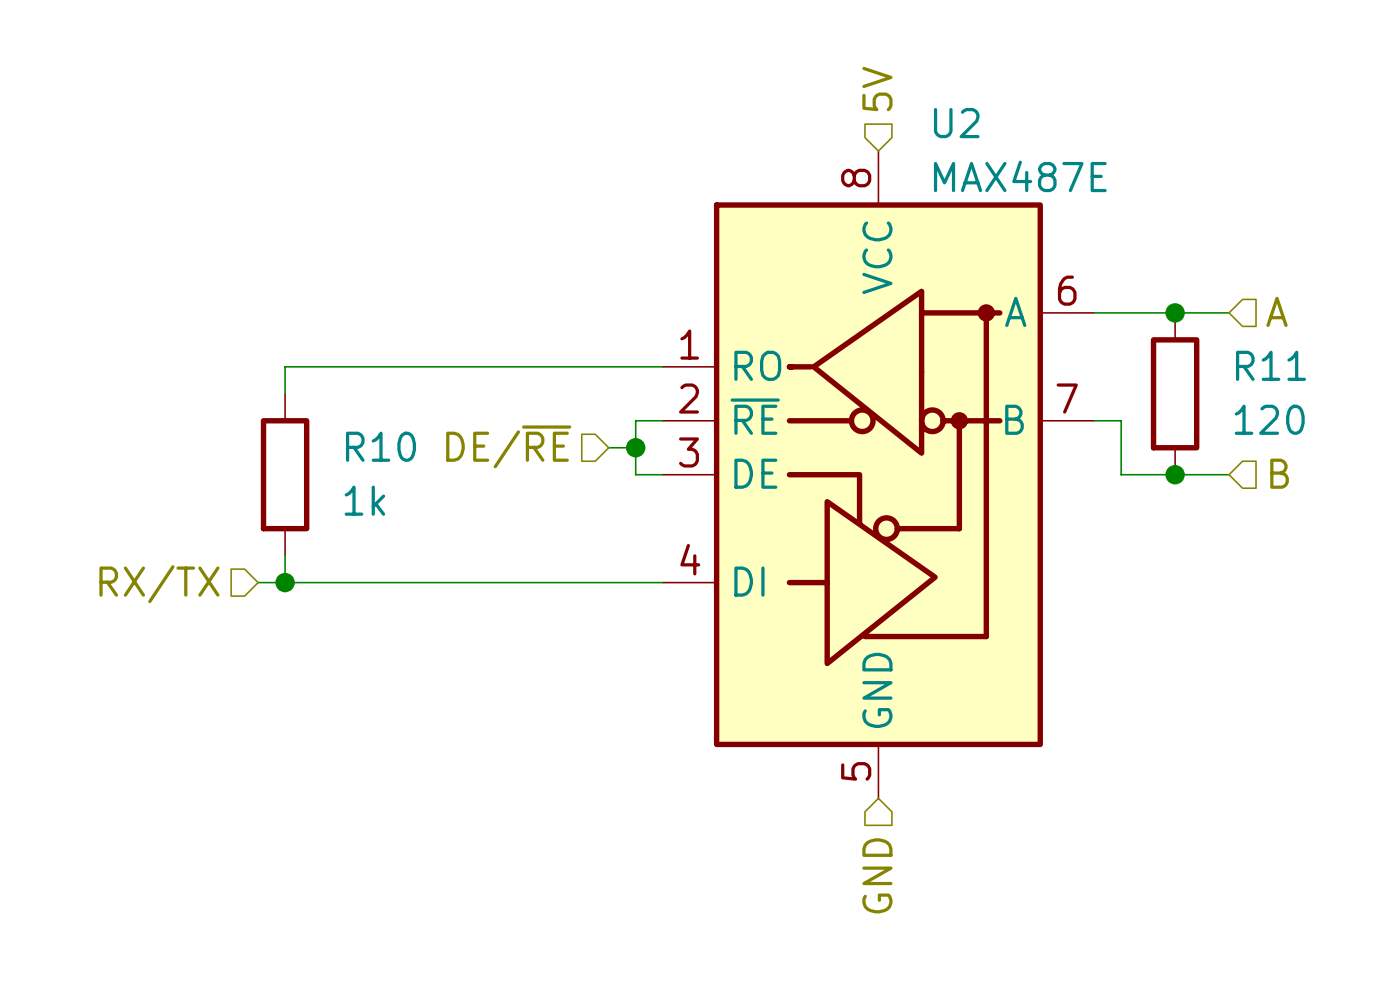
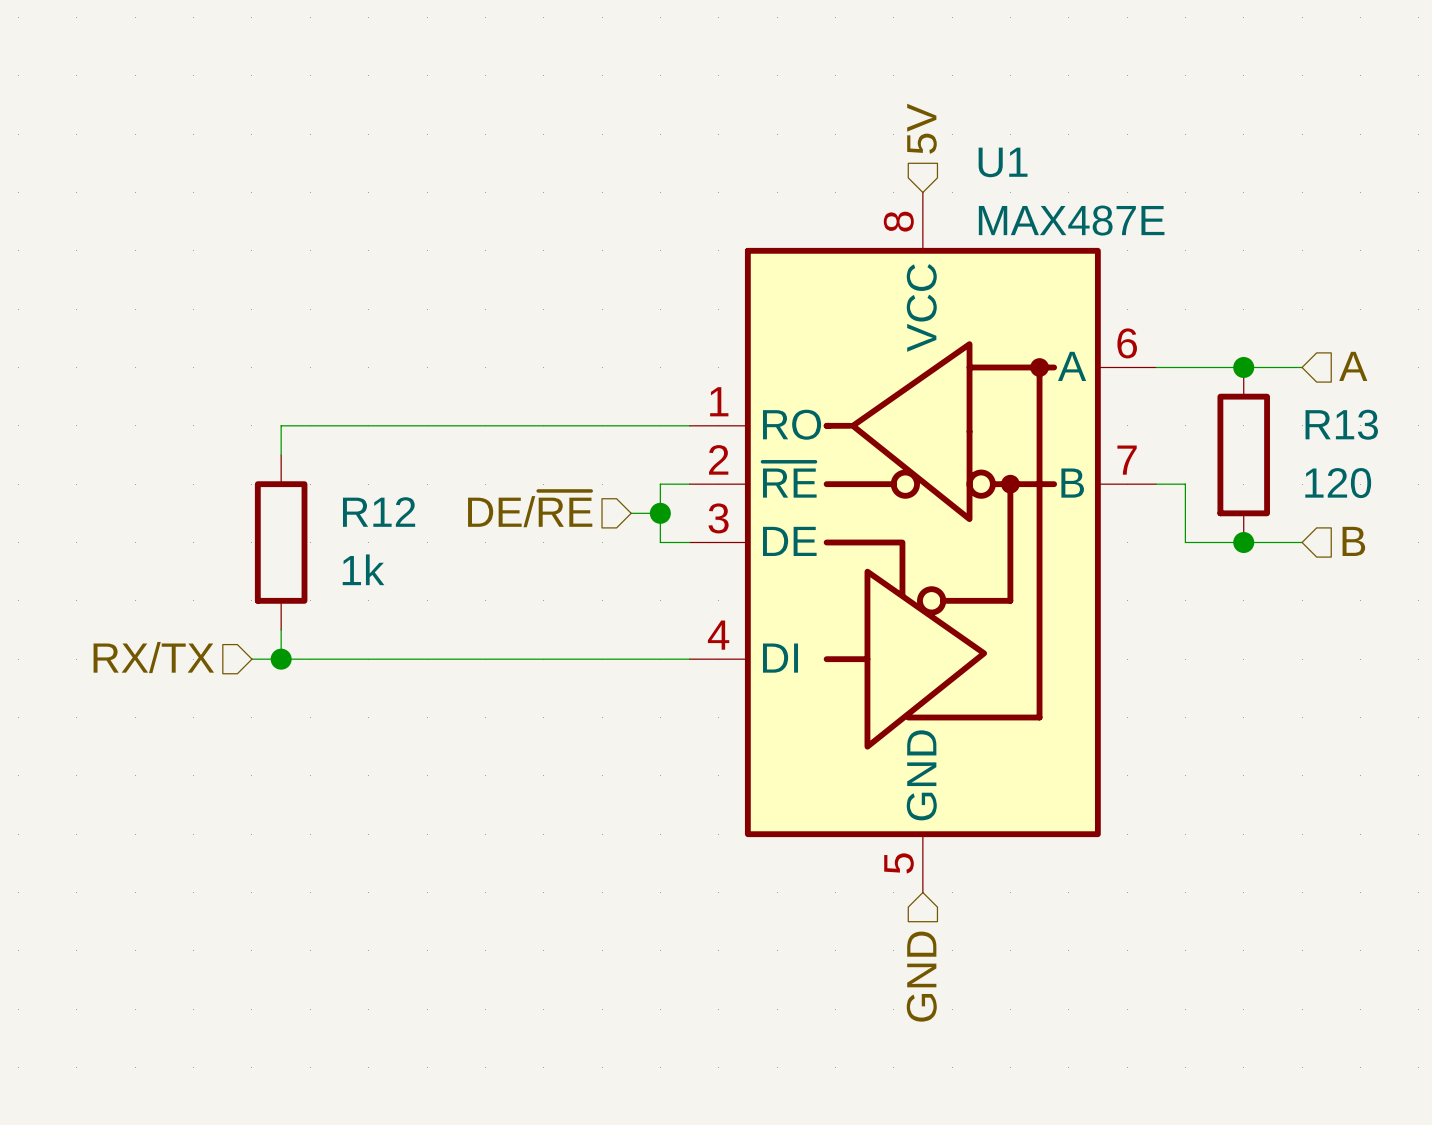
U2 name: U2 (956, 123) -> U1 (1003, 162)
R11 name: R11 (1270, 365) -> R13 (1341, 424)
R10 name: R10 (380, 446) -> R12 (379, 512)

